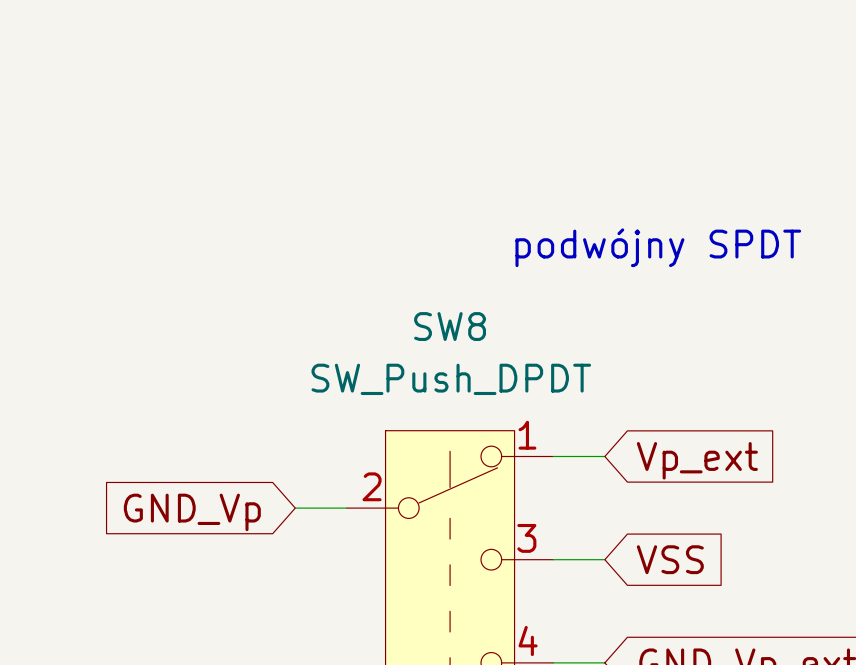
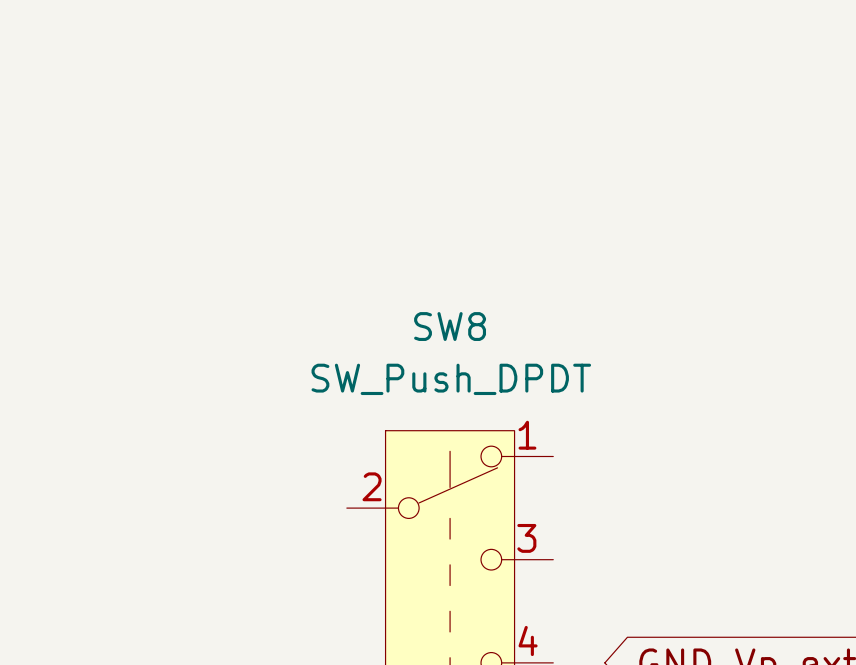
text: podwójny SPDT (658, 247) -> none
wire: (553, 456) (604, 456) -> none
global label: Vp_ext (697, 460) -> none
wire: (295, 508) (346, 508) -> none
global label: GND_Vp (192, 512) -> none
wire: (553, 559) (604, 559) -> none
global label: VSS (670, 559) -> none
wire: (553, 662) (604, 662) -> none

